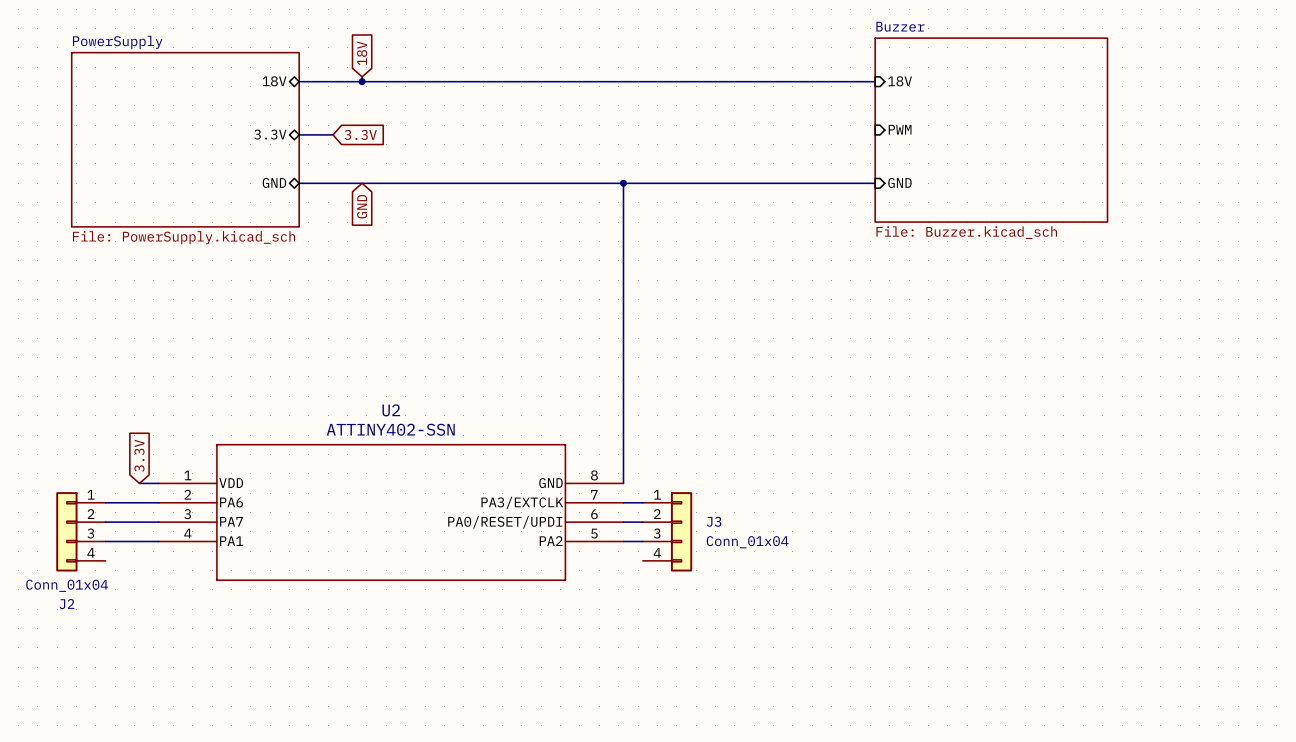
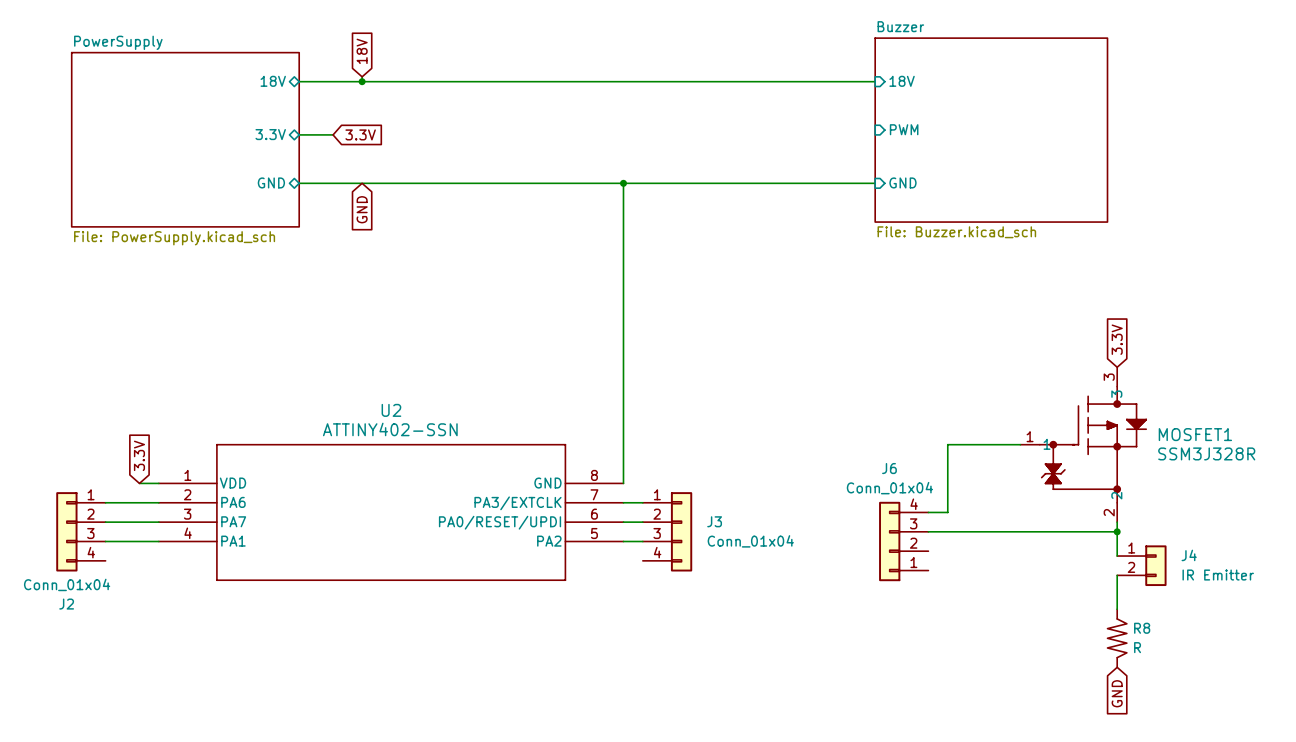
global label: none -> 3.3V (1117, 339)
wire: none -> (1020, 444) (947, 444) (947, 512) (928, 512)
MOSFET1: none -> SSM3J328R (1083, 444)
wire: none -> (1117, 522) (1117, 556)
wire: none -> (928, 531) (1117, 531)
junction: none -> (1117, 531)
J6: none -> Conn_01x04 (903, 541)
J4: none -> IR Emitter (1141, 565)
wire: none -> (1117, 575) (1117, 609)
R8: none -> R (1117, 638)
global label: none -> GND (1117, 693)

